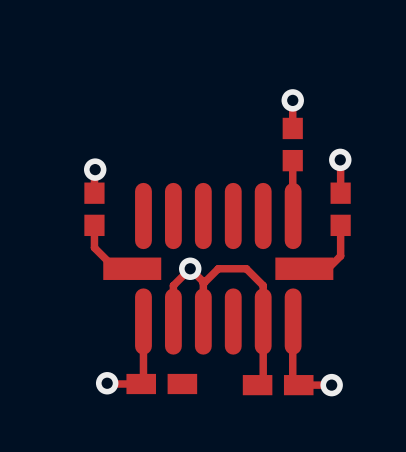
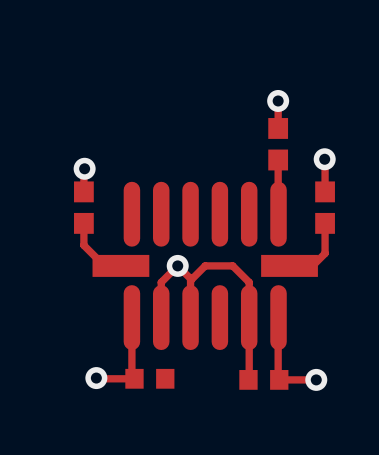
part footprint: [126, 373, 198, 395] -> [125, 368, 175, 389]
part footprint: [242, 375, 314, 396] -> [239, 370, 289, 390]

